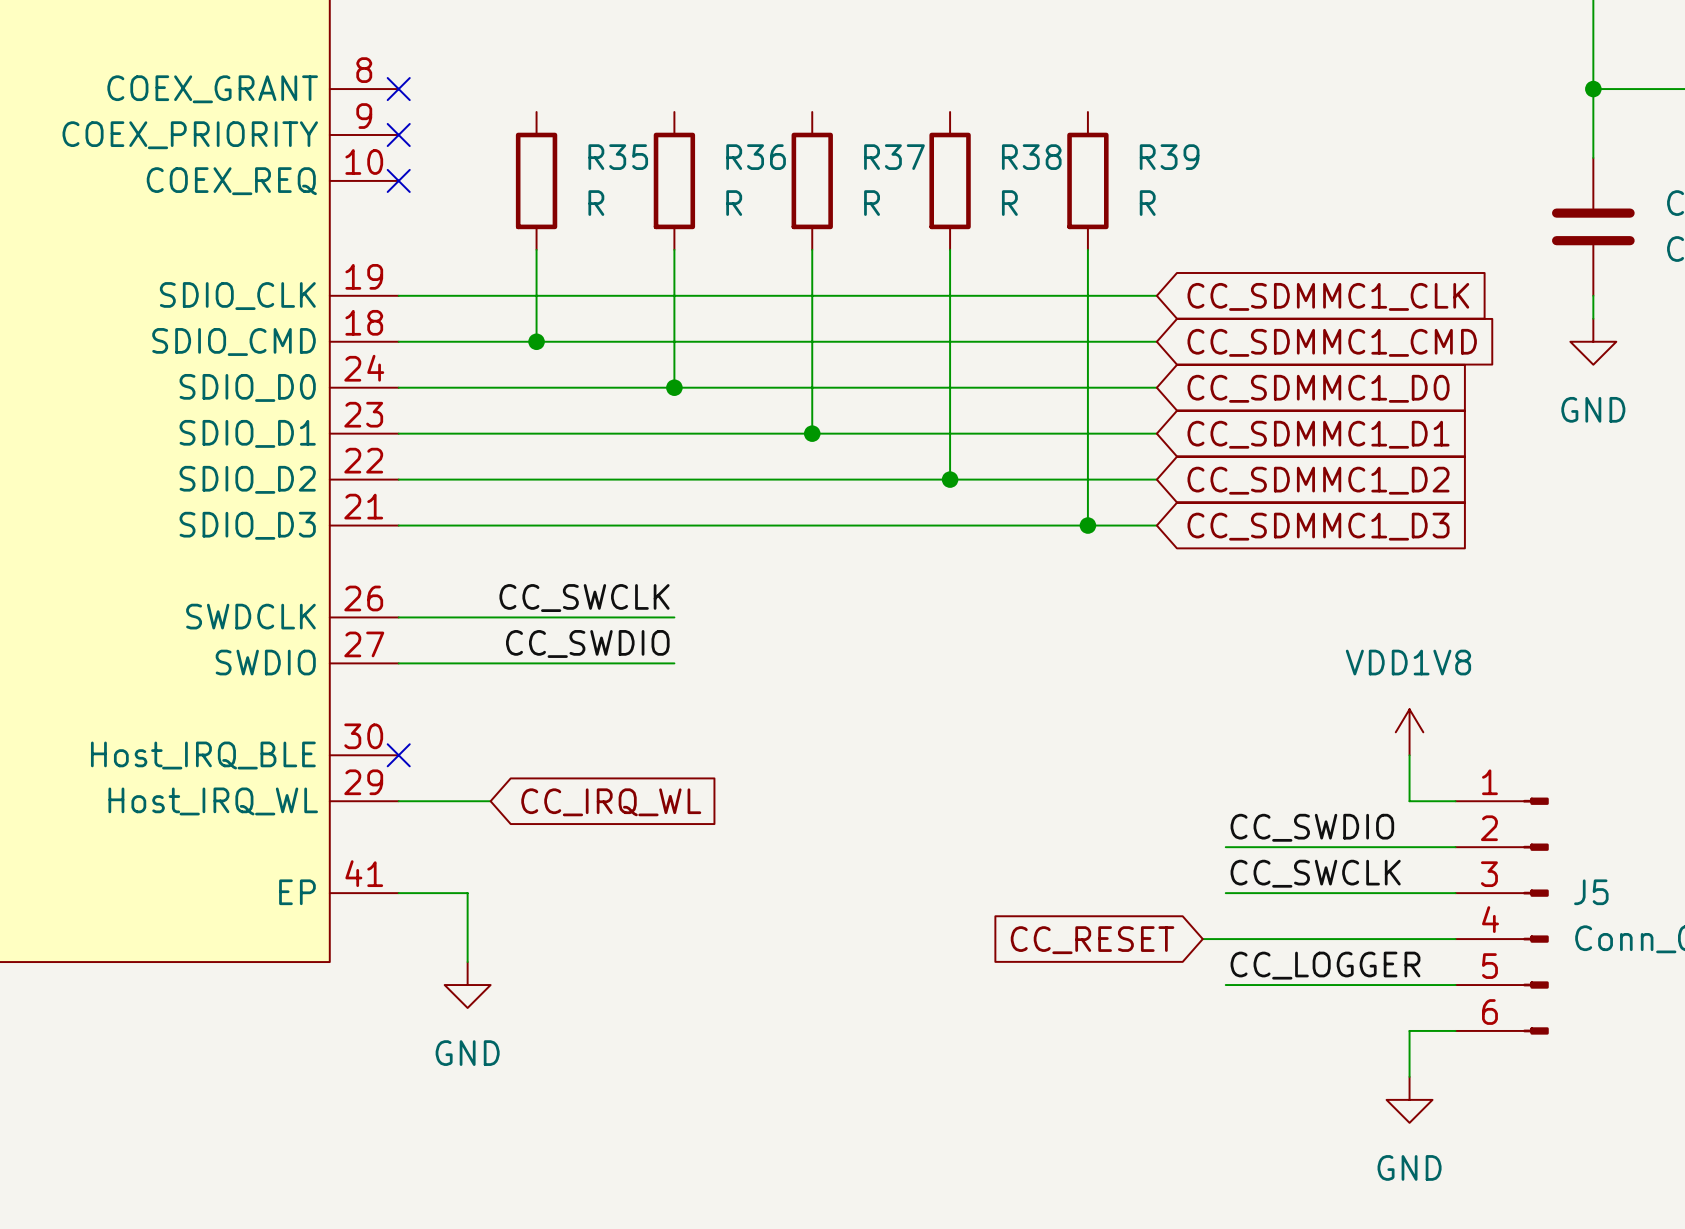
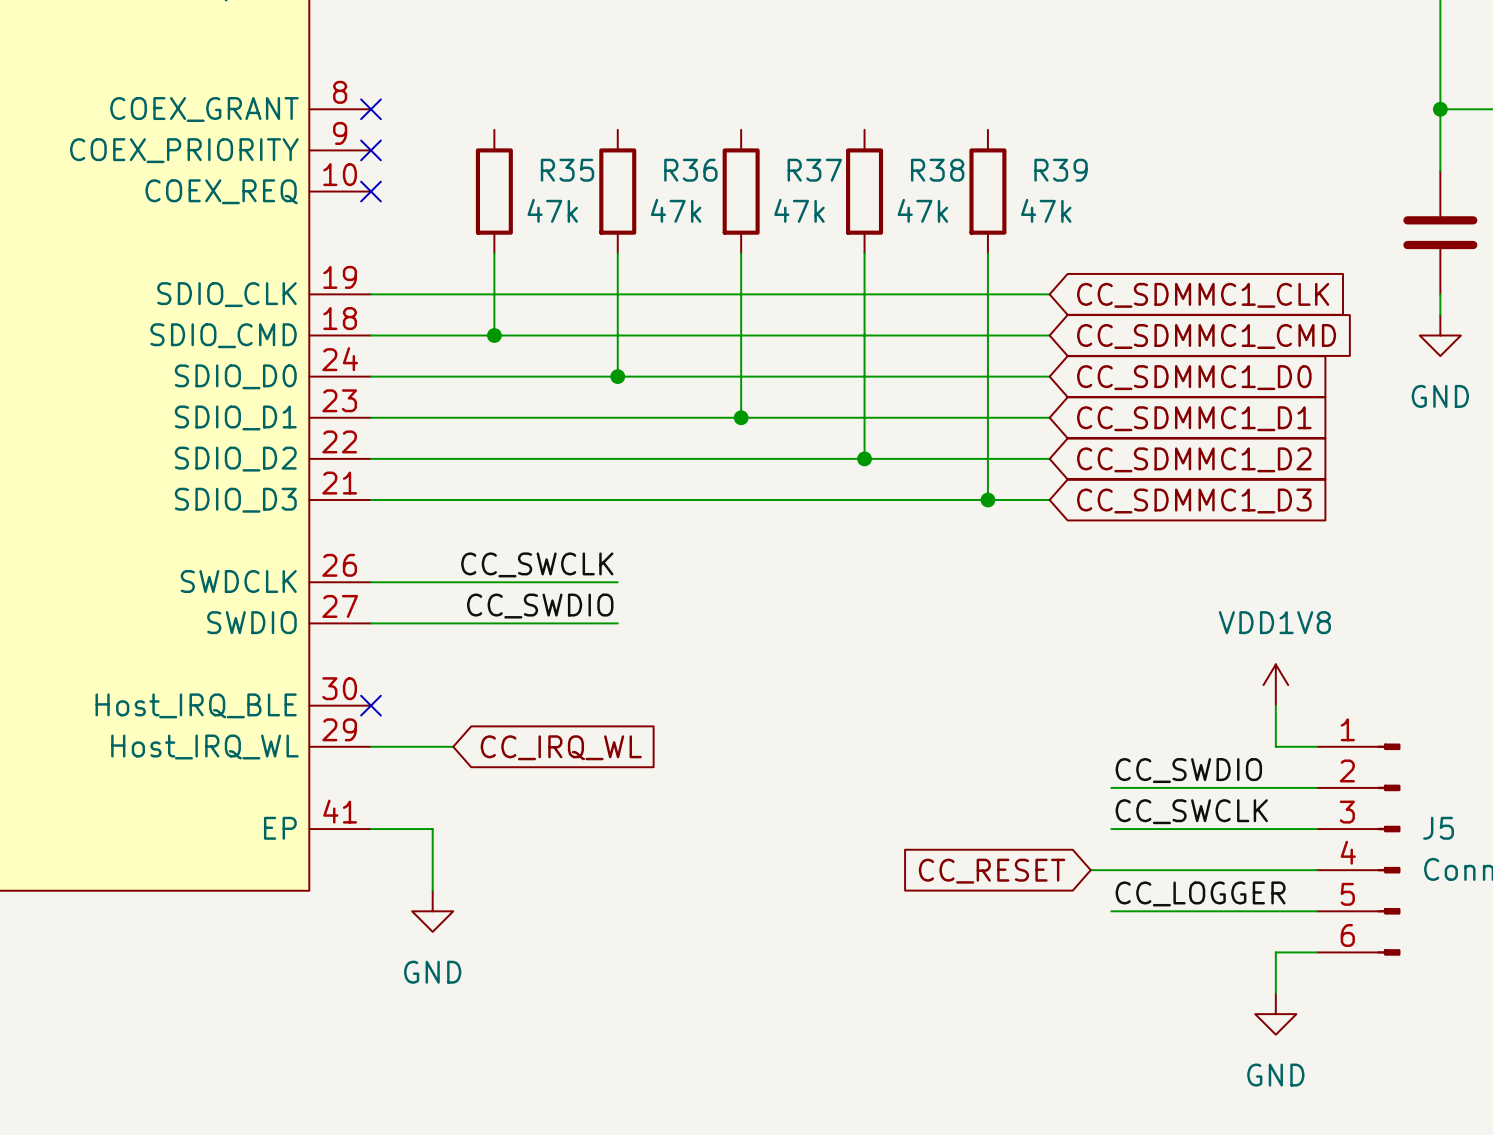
R35 value: R (596, 203) -> 47k (552, 210)
R36 value: R (734, 203) -> 47k (676, 210)
R37 value: R (872, 203) -> 47k (799, 210)
R38 value: R (1009, 203) -> 47k (922, 210)
R39 value: R (1147, 203) -> 47k (1046, 210)

